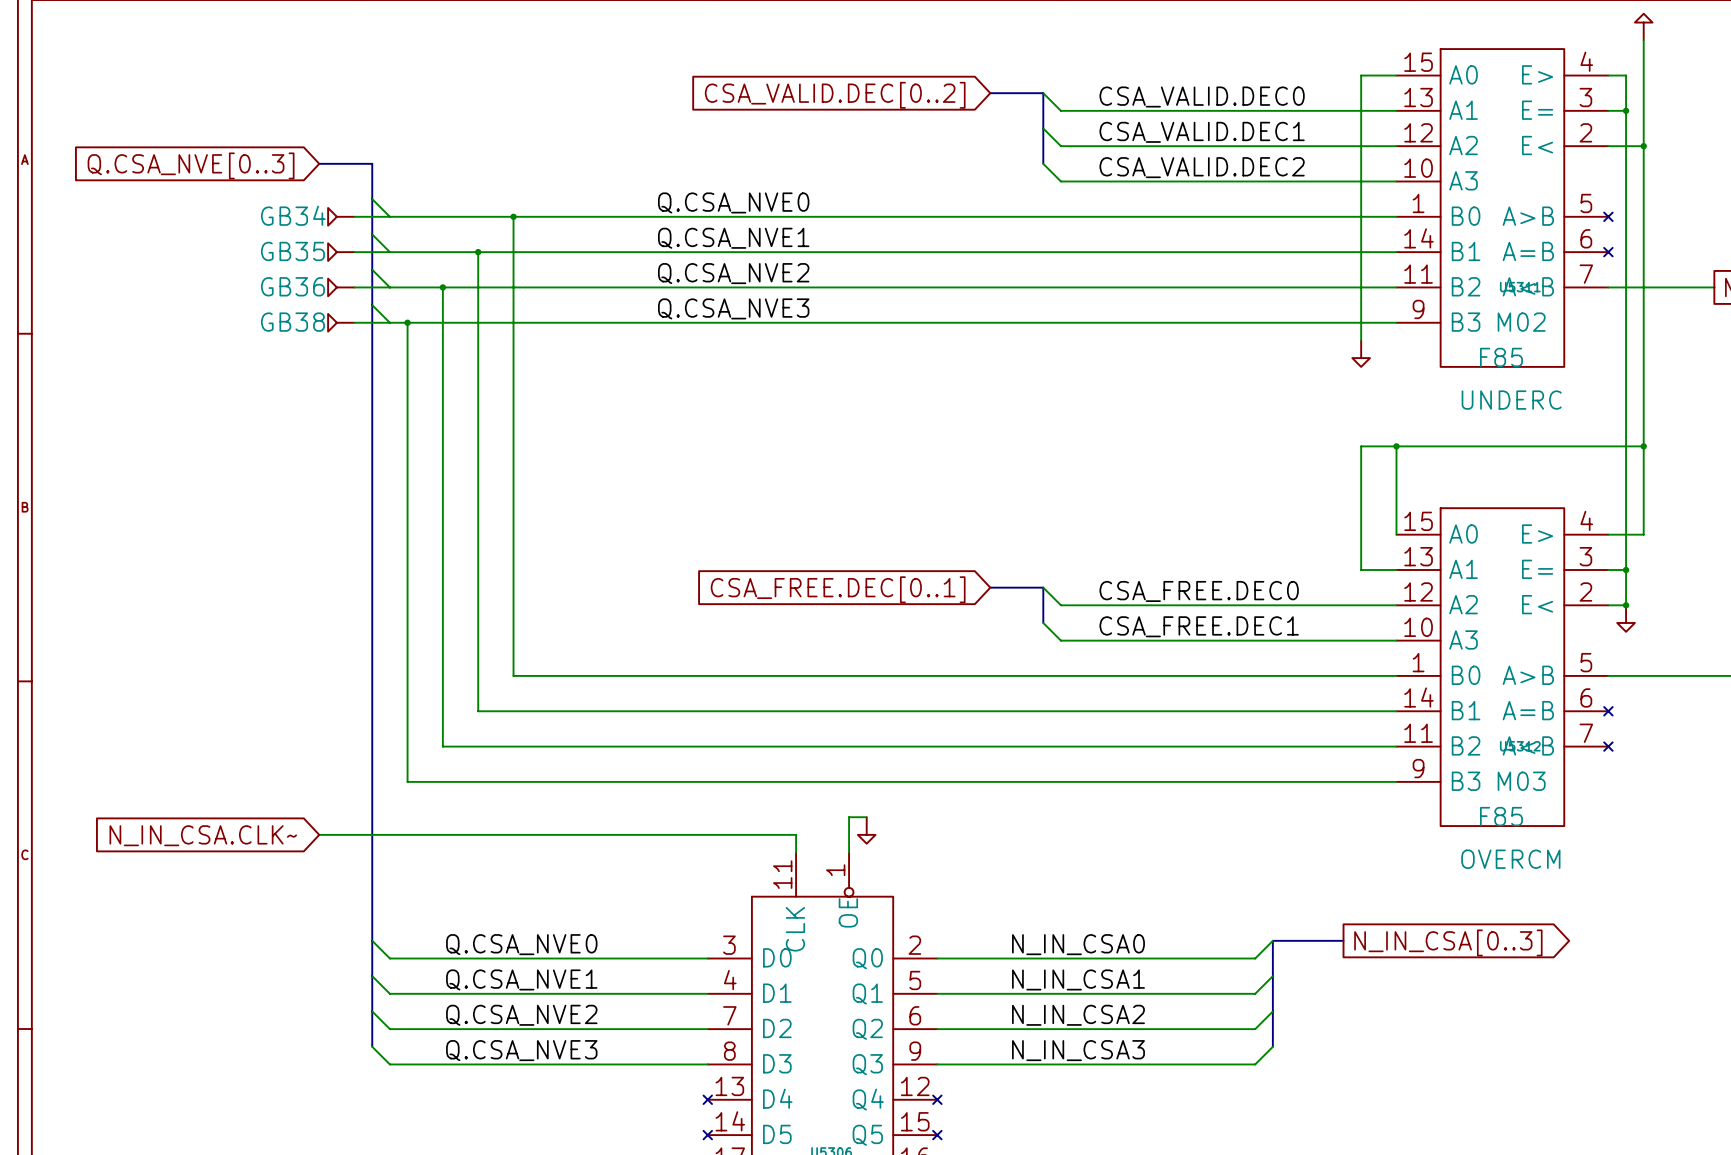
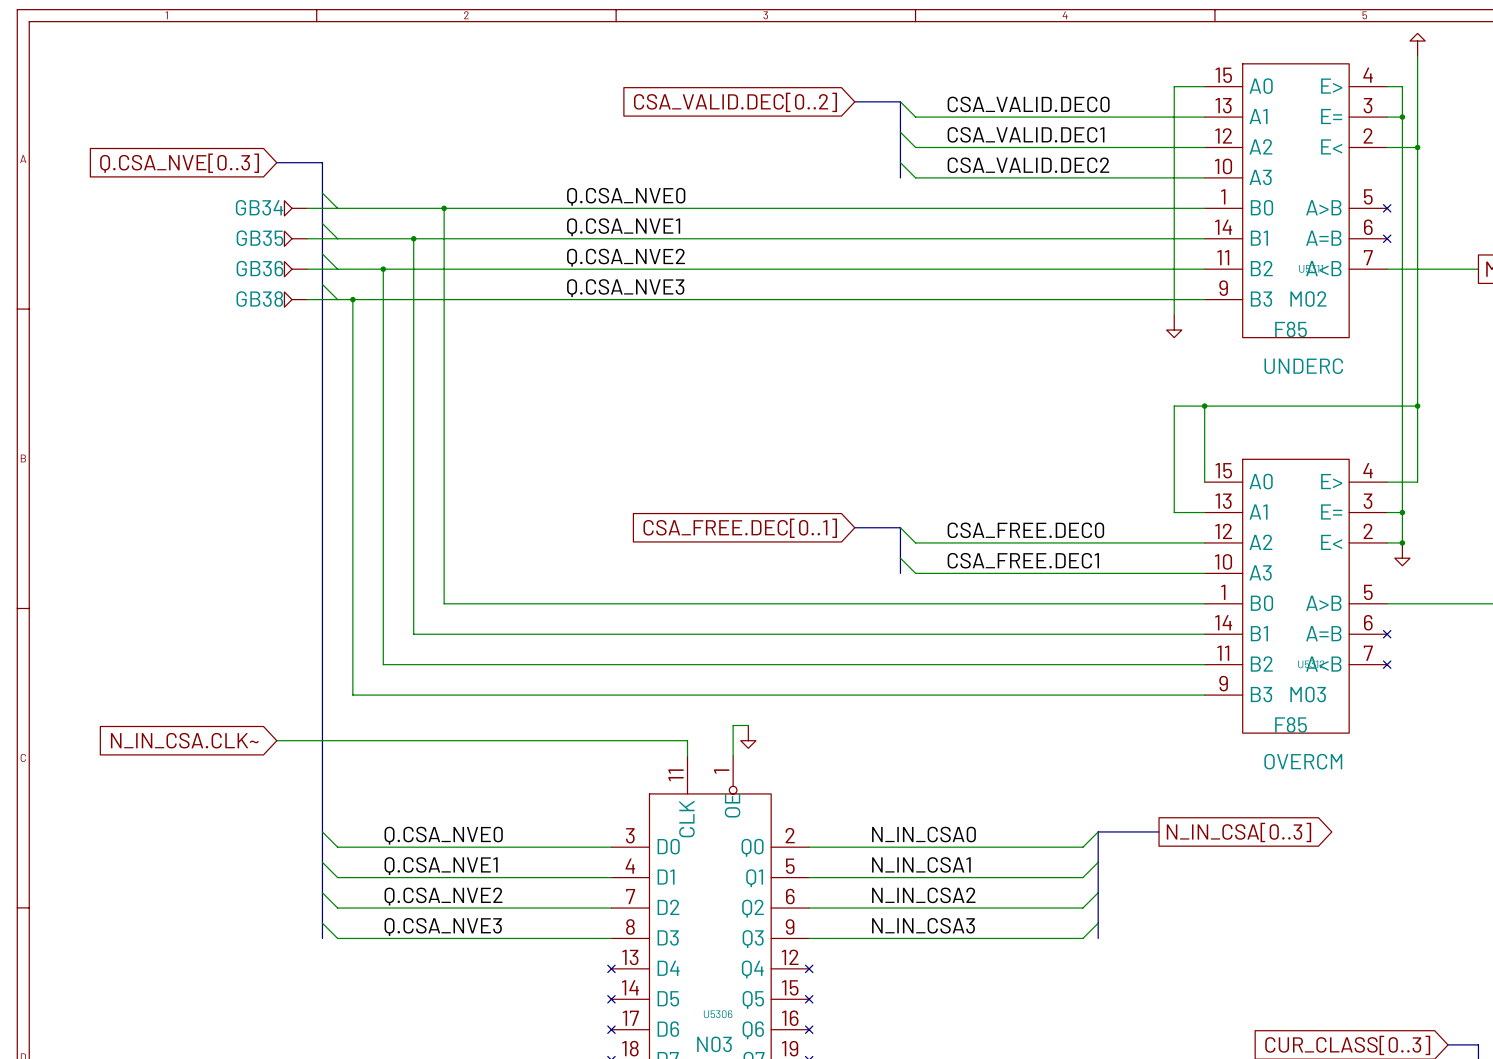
bus: none -> (900, 162) (900, 177)
bus: none -> (900, 558) (900, 573)
bus: none -> (322, 923) (322, 938)
bus: none -> (1098, 923) (1098, 938)

